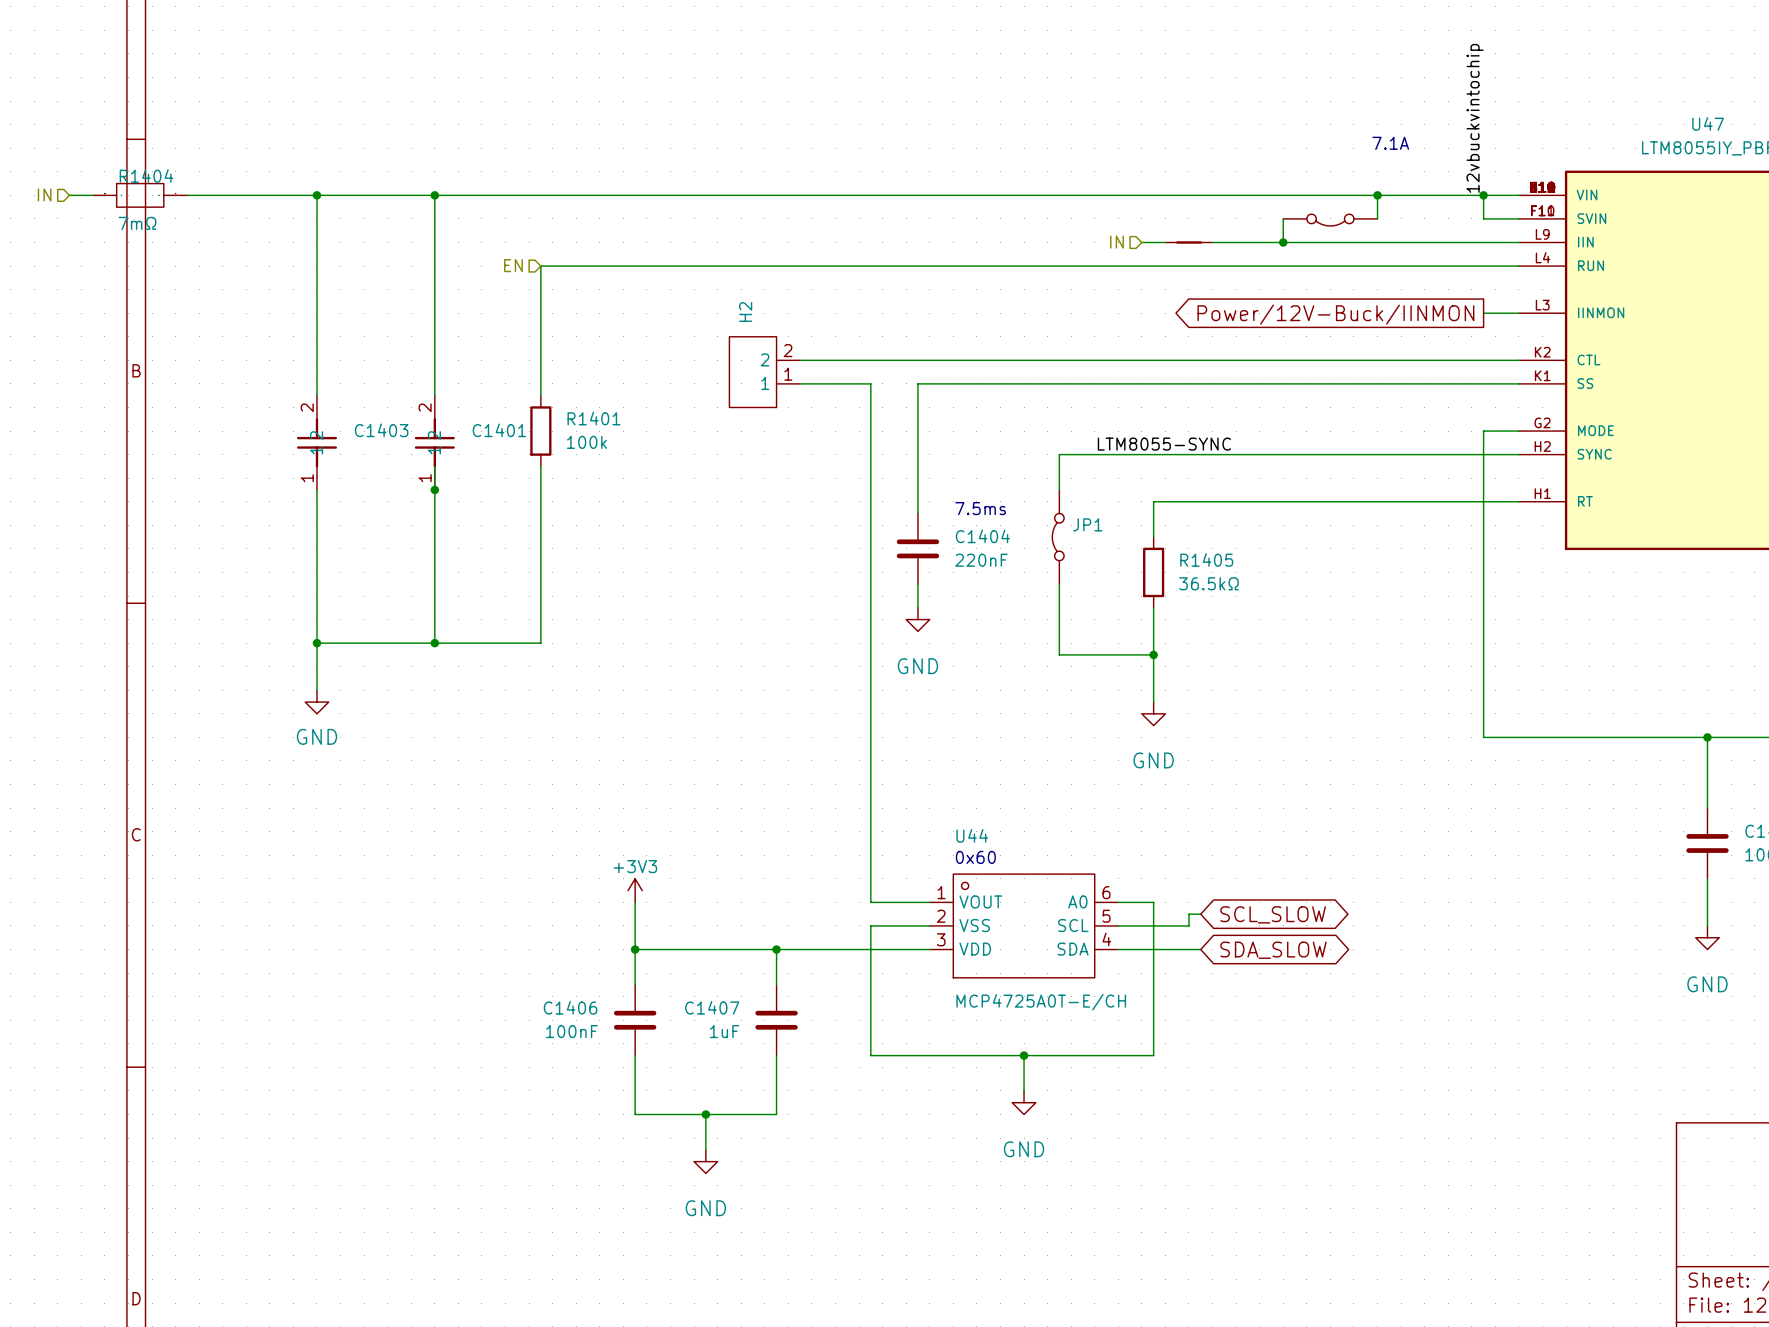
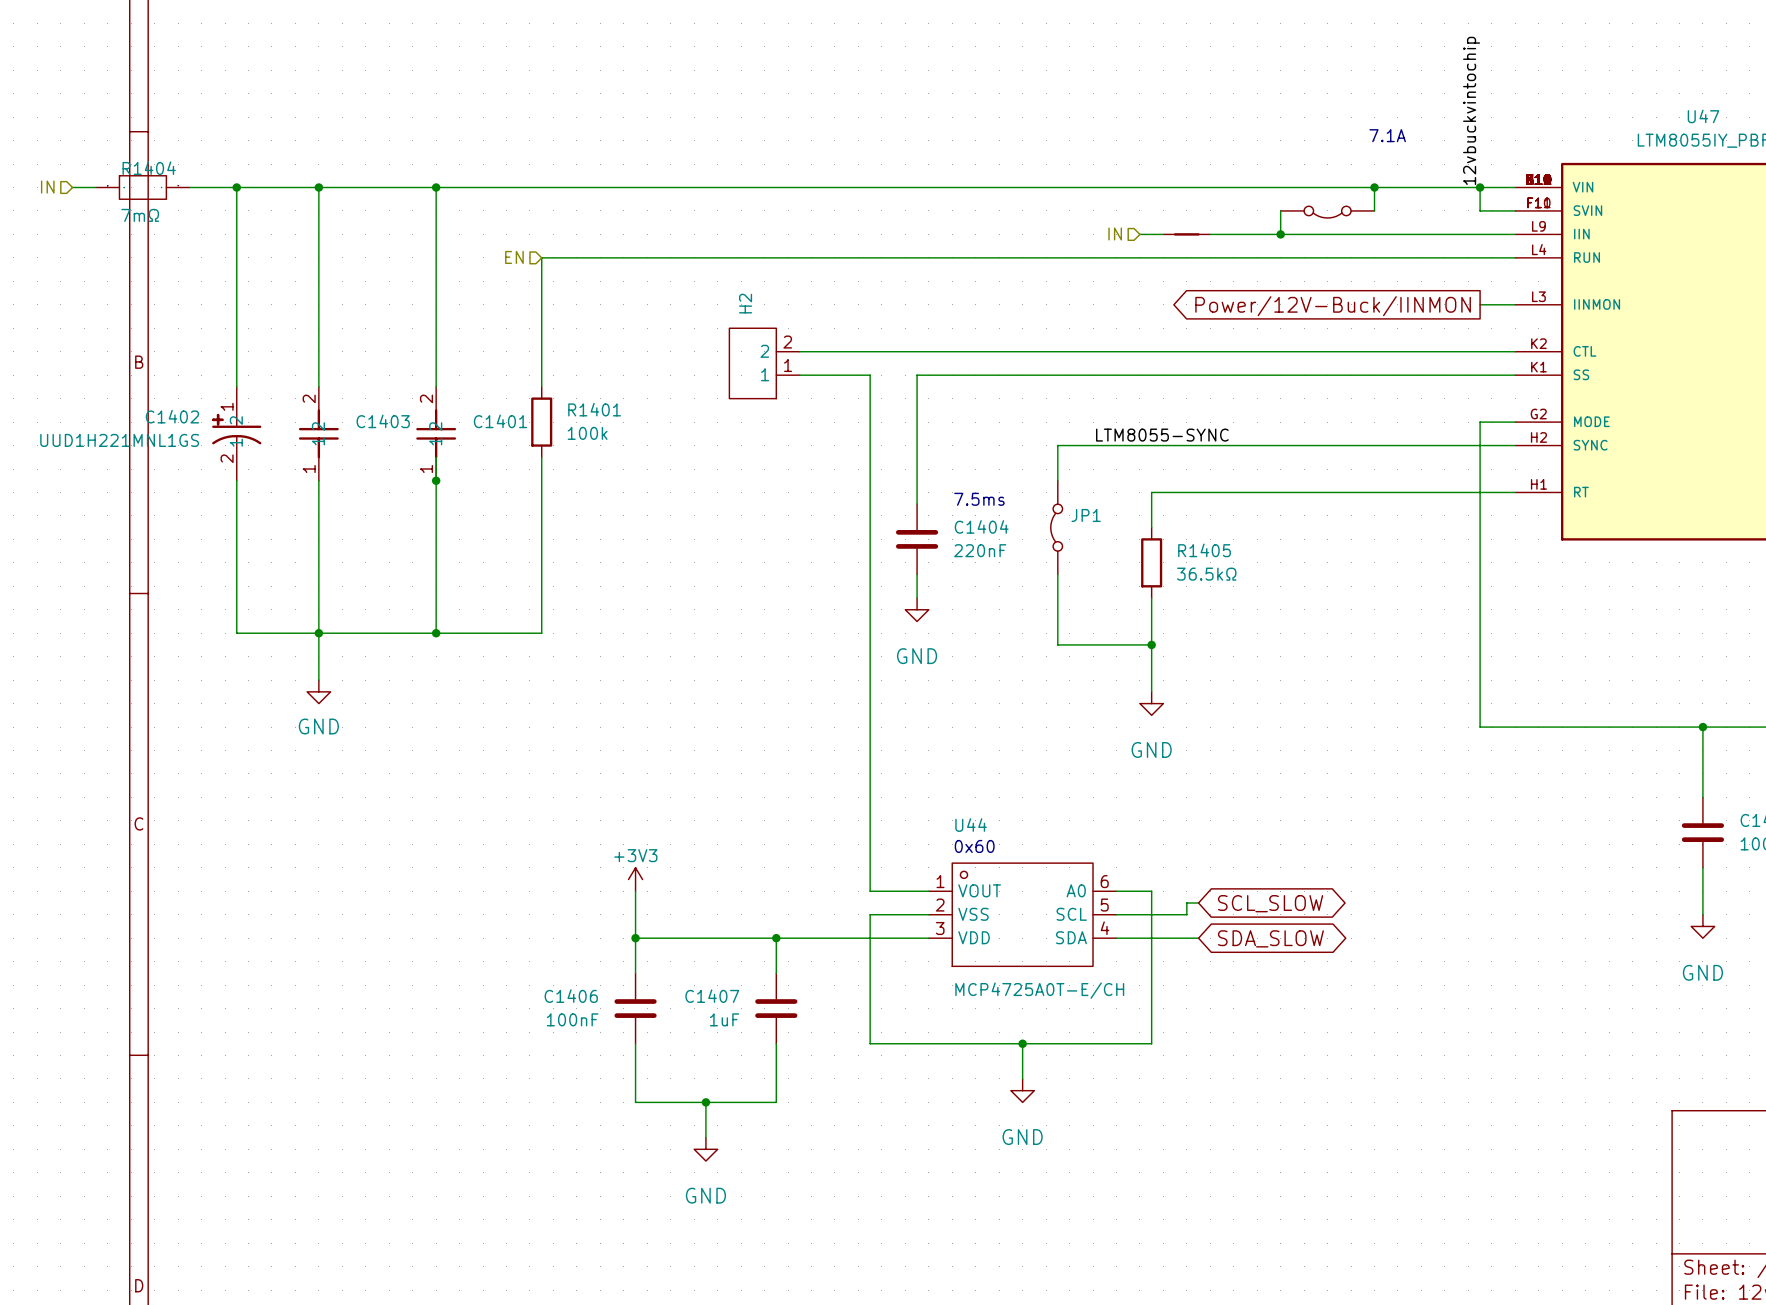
wire: none -> (236, 187) (236, 386)
junction: none -> (236, 187)
C1402: none -> UUD1H221MNL1GS (236, 433)
wire: none -> (236, 480) (236, 633) (318, 633)

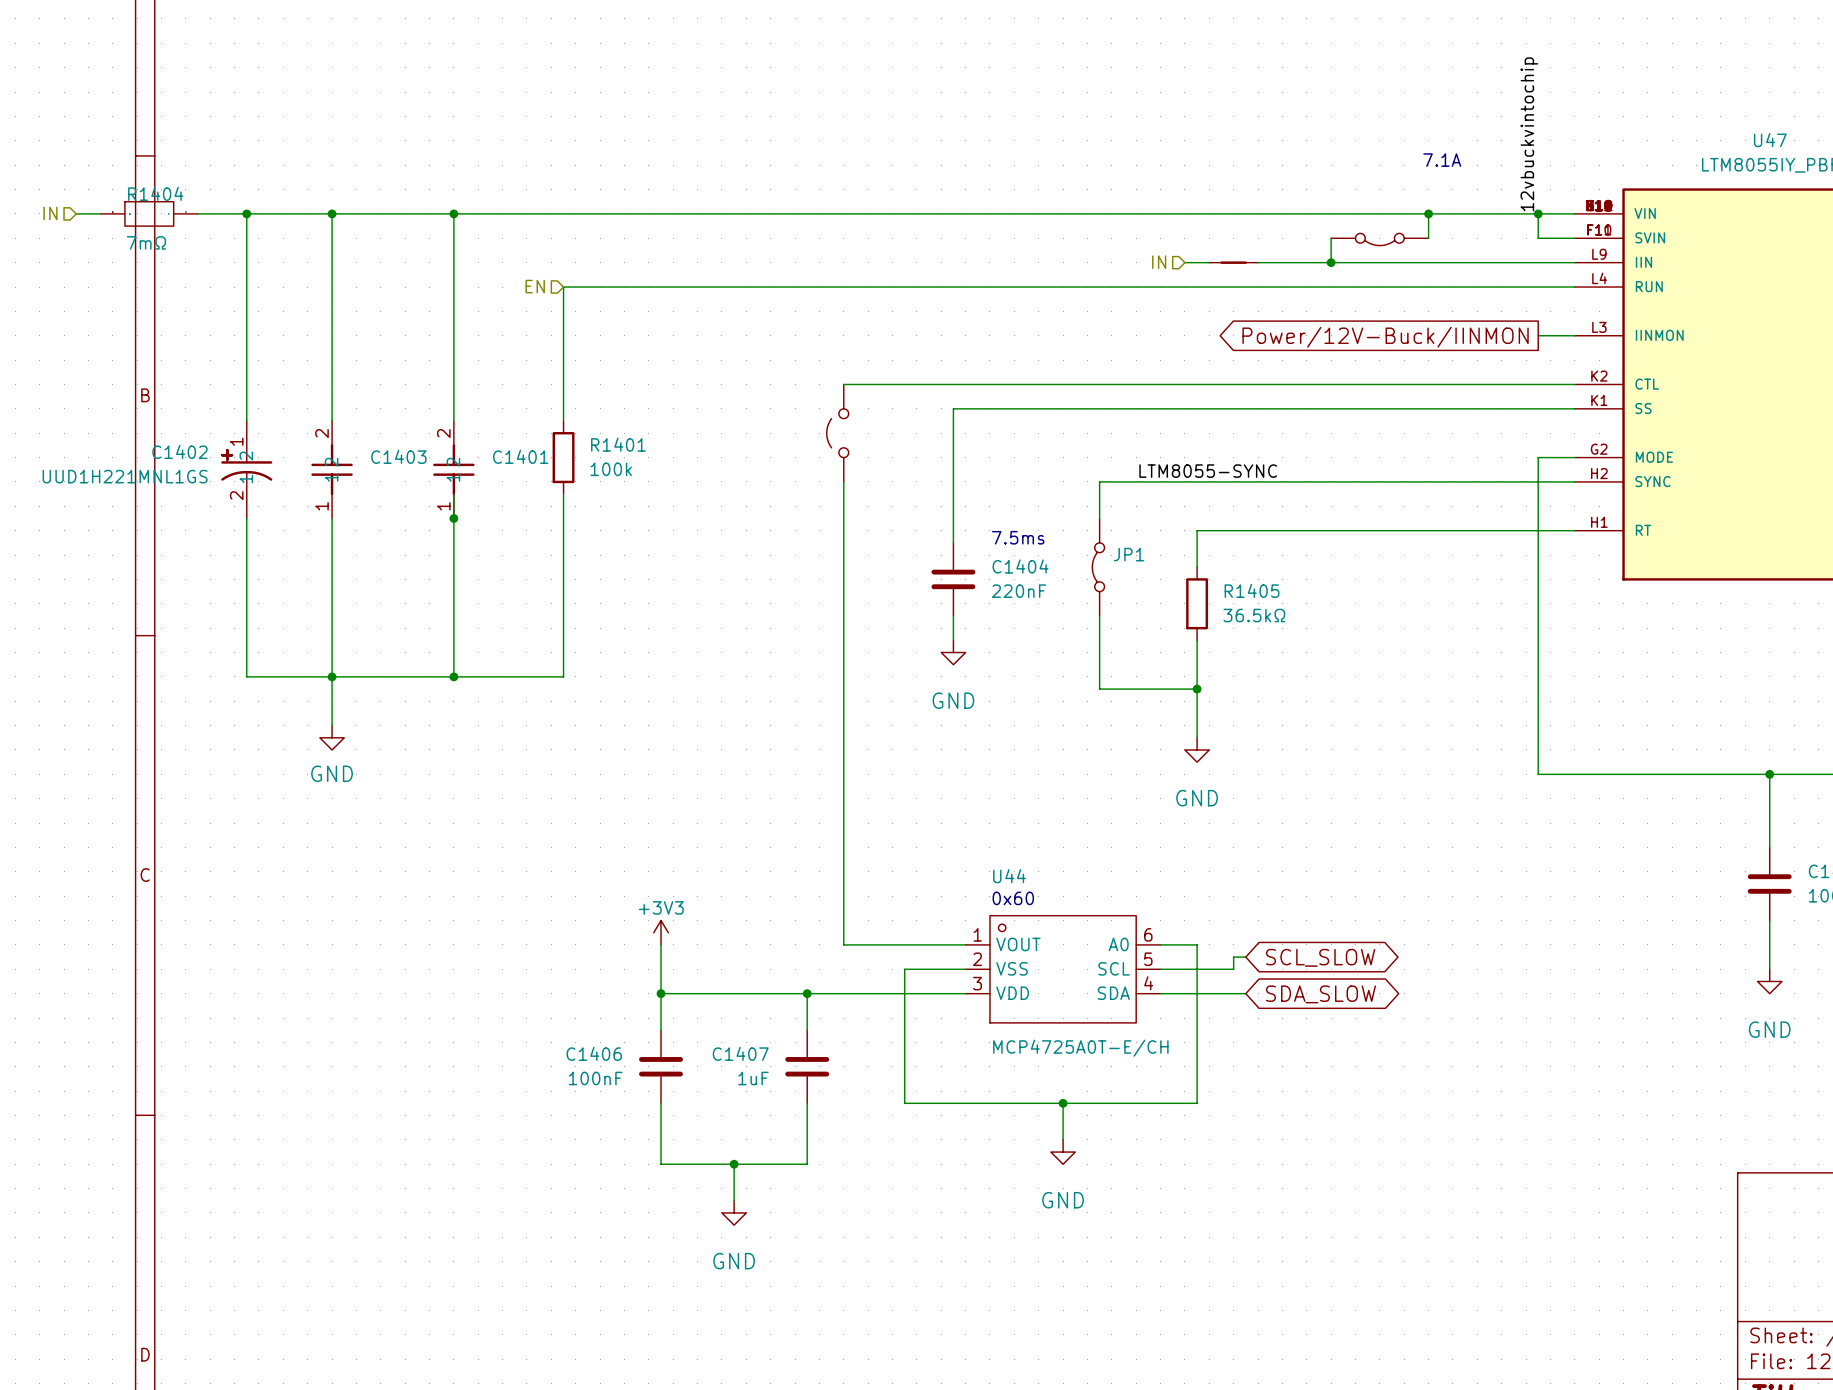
wire: (799, 351) (811, 351) -> none
H2: (764, 363) -> none
wire: (799, 375) (870, 375) (870, 891) -> (843, 481) (843, 944) (904, 944)
part: none -> (837, 433)

